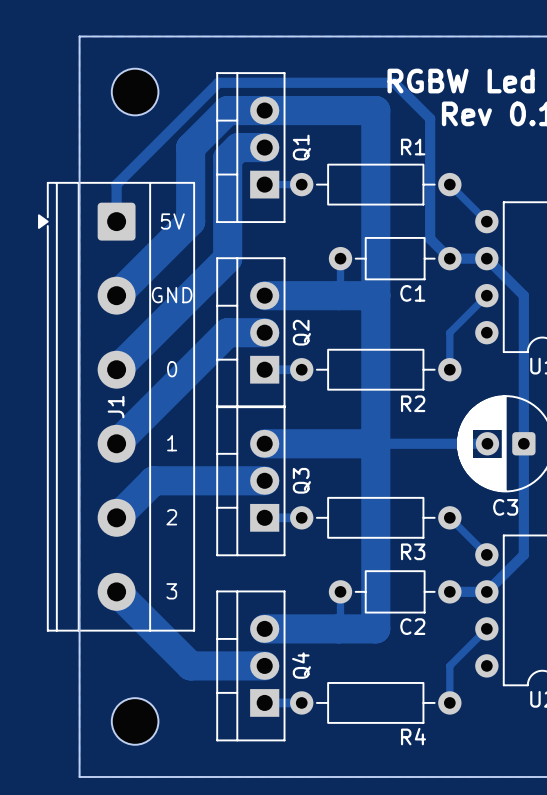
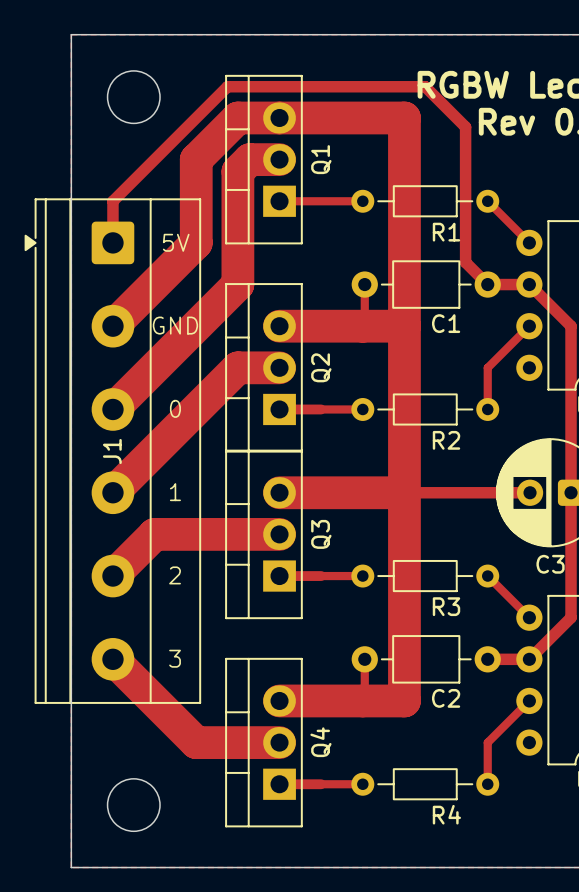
R1 name position: R1 (413, 147) -> R1 (446, 232)
R1 footprint: [290, 163, 462, 206] -> [351, 185, 500, 218]
track: none -> (321, 201) (362, 201)
R2 footprint: [290, 348, 462, 391] -> [351, 393, 500, 426]
track: none -> (321, 409) (362, 409)
R3 footprint: [290, 496, 462, 539] -> [351, 559, 500, 593]
track: none -> (321, 576) (362, 576)
R4 footprint: [290, 682, 462, 724] -> [351, 768, 500, 801]
track: none -> (321, 784) (362, 784)

